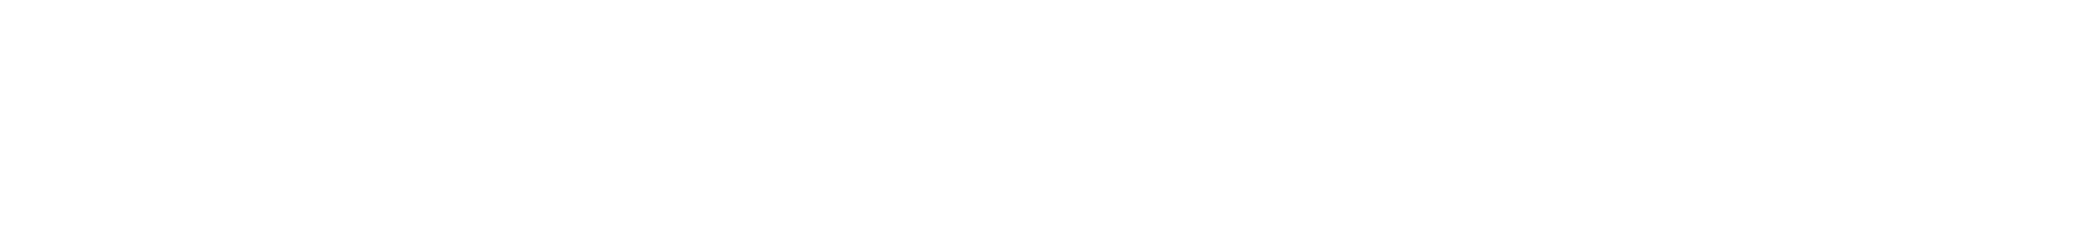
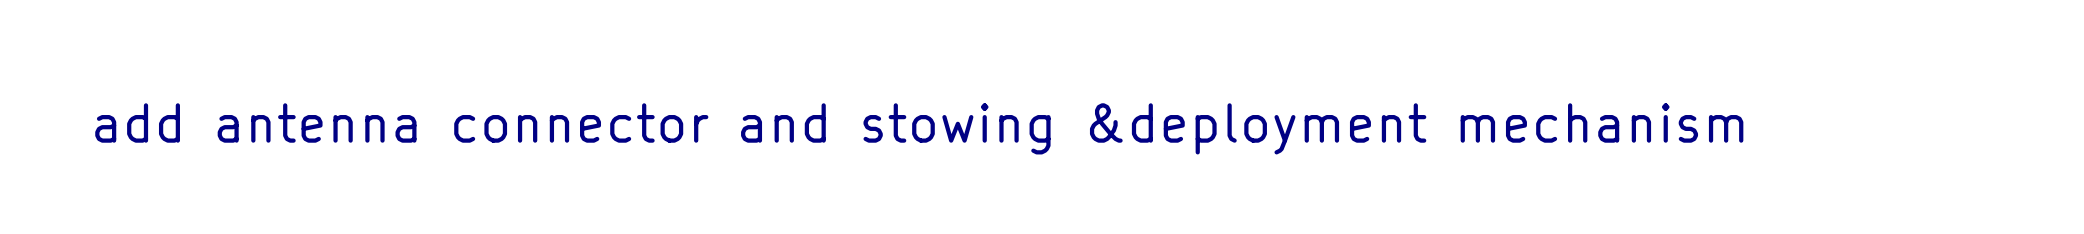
text: none -> add antenna connector and stowing &deployment mechanism (919, 128)

